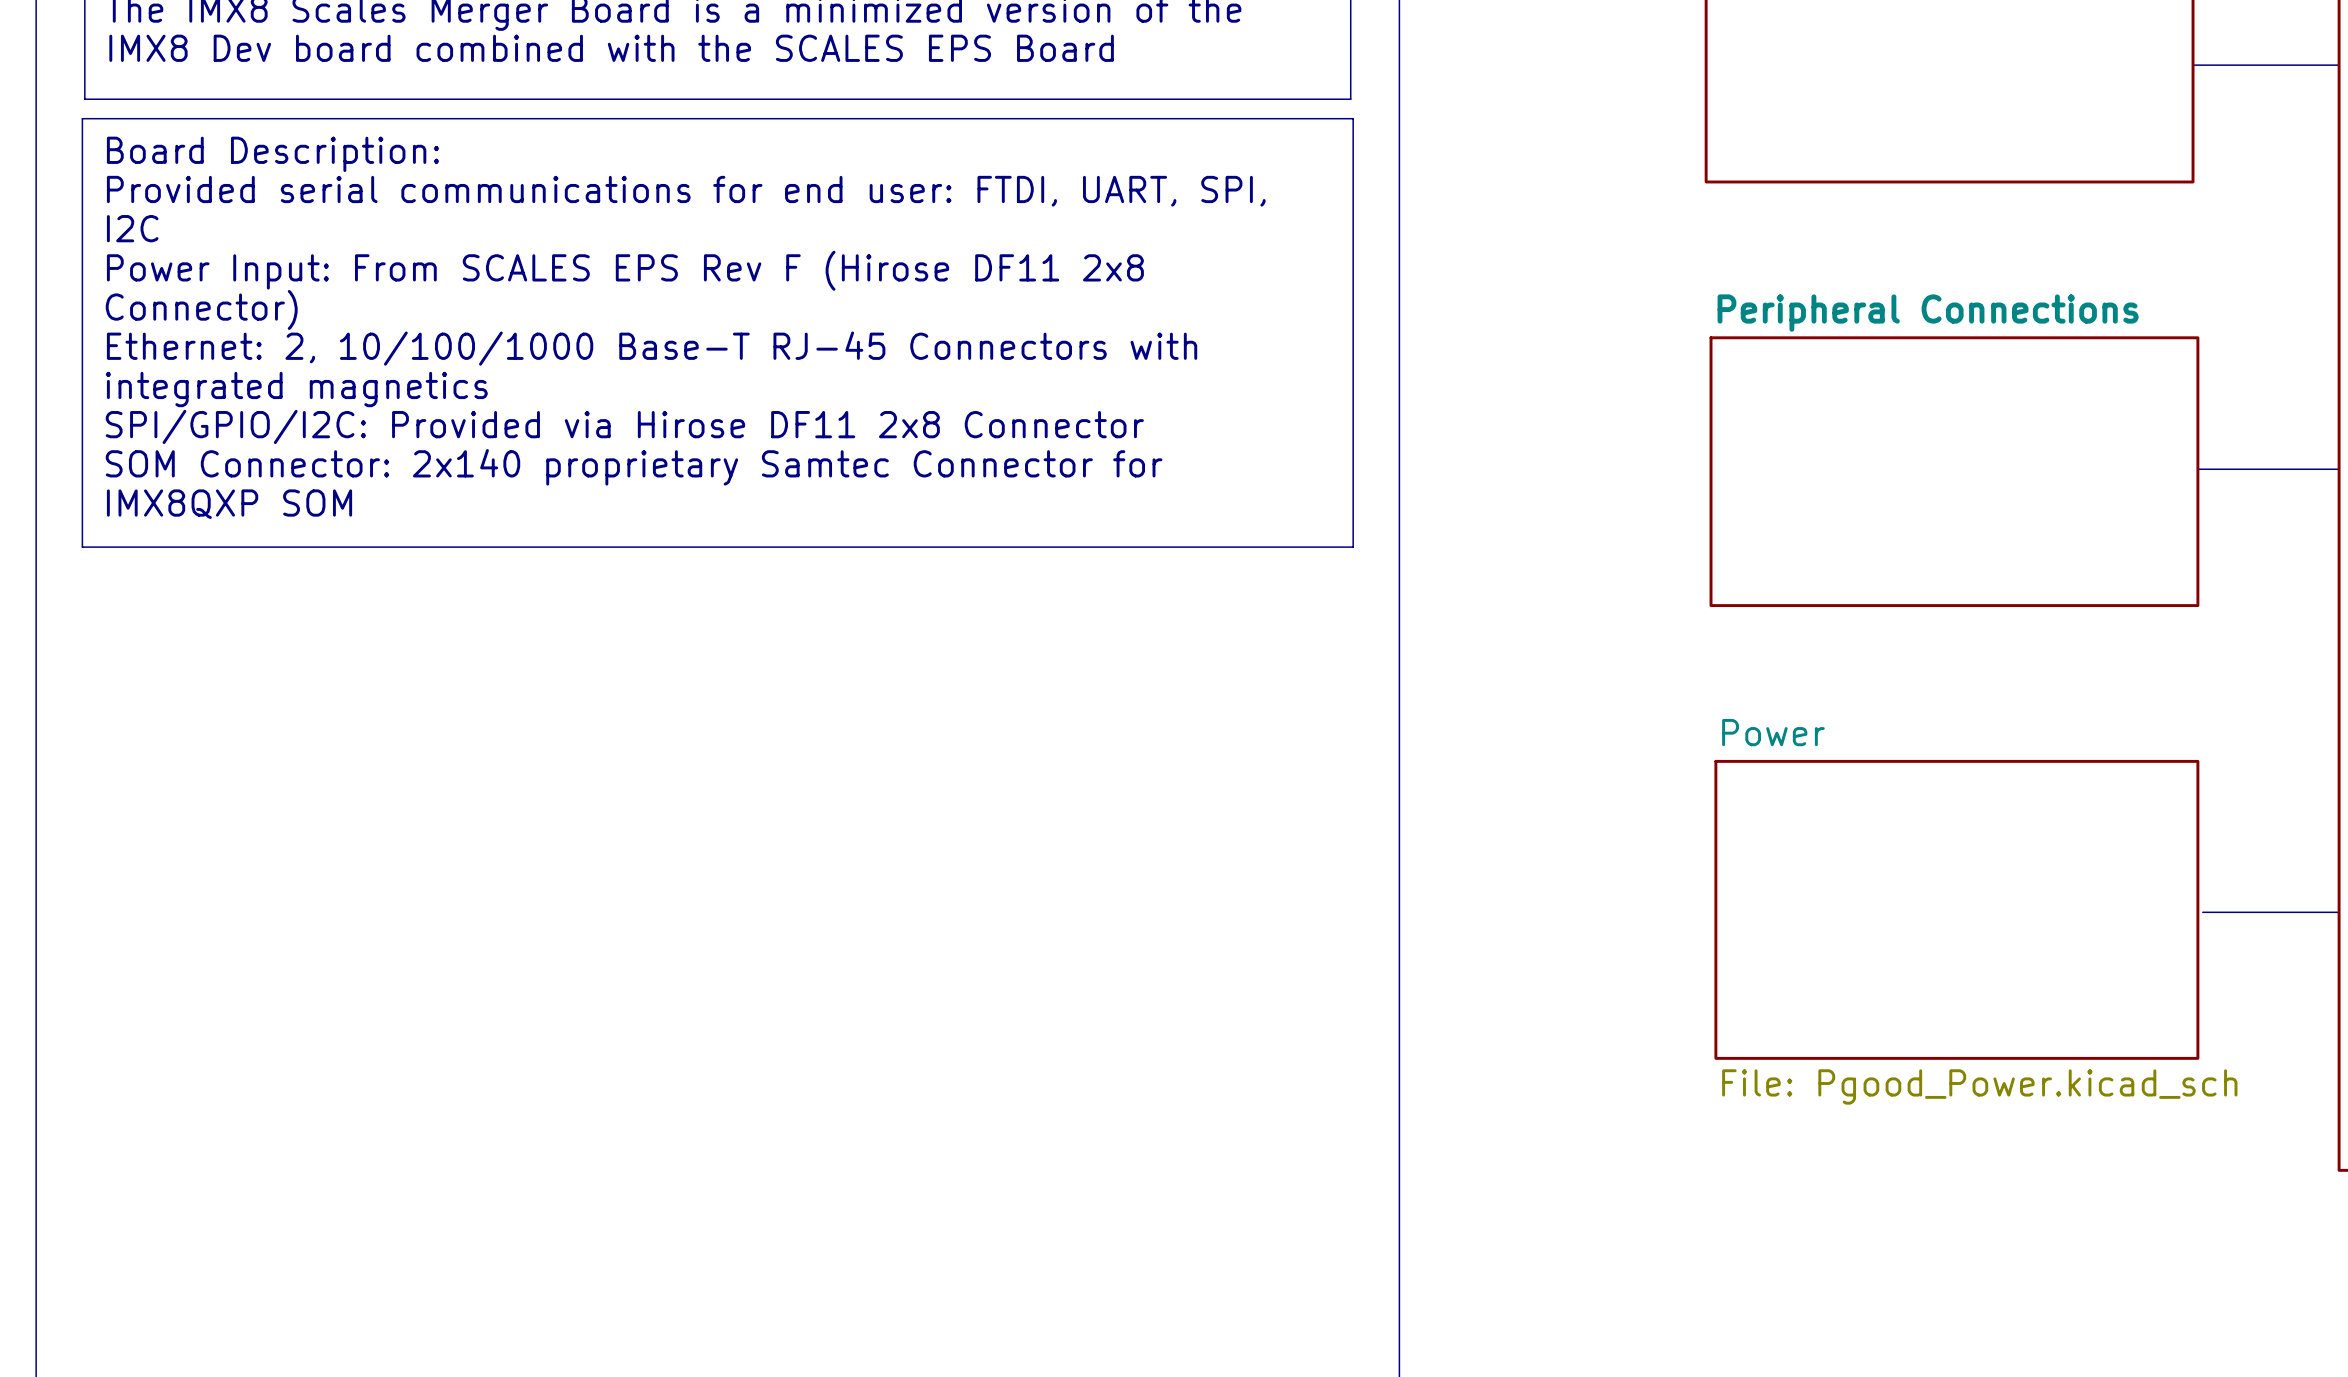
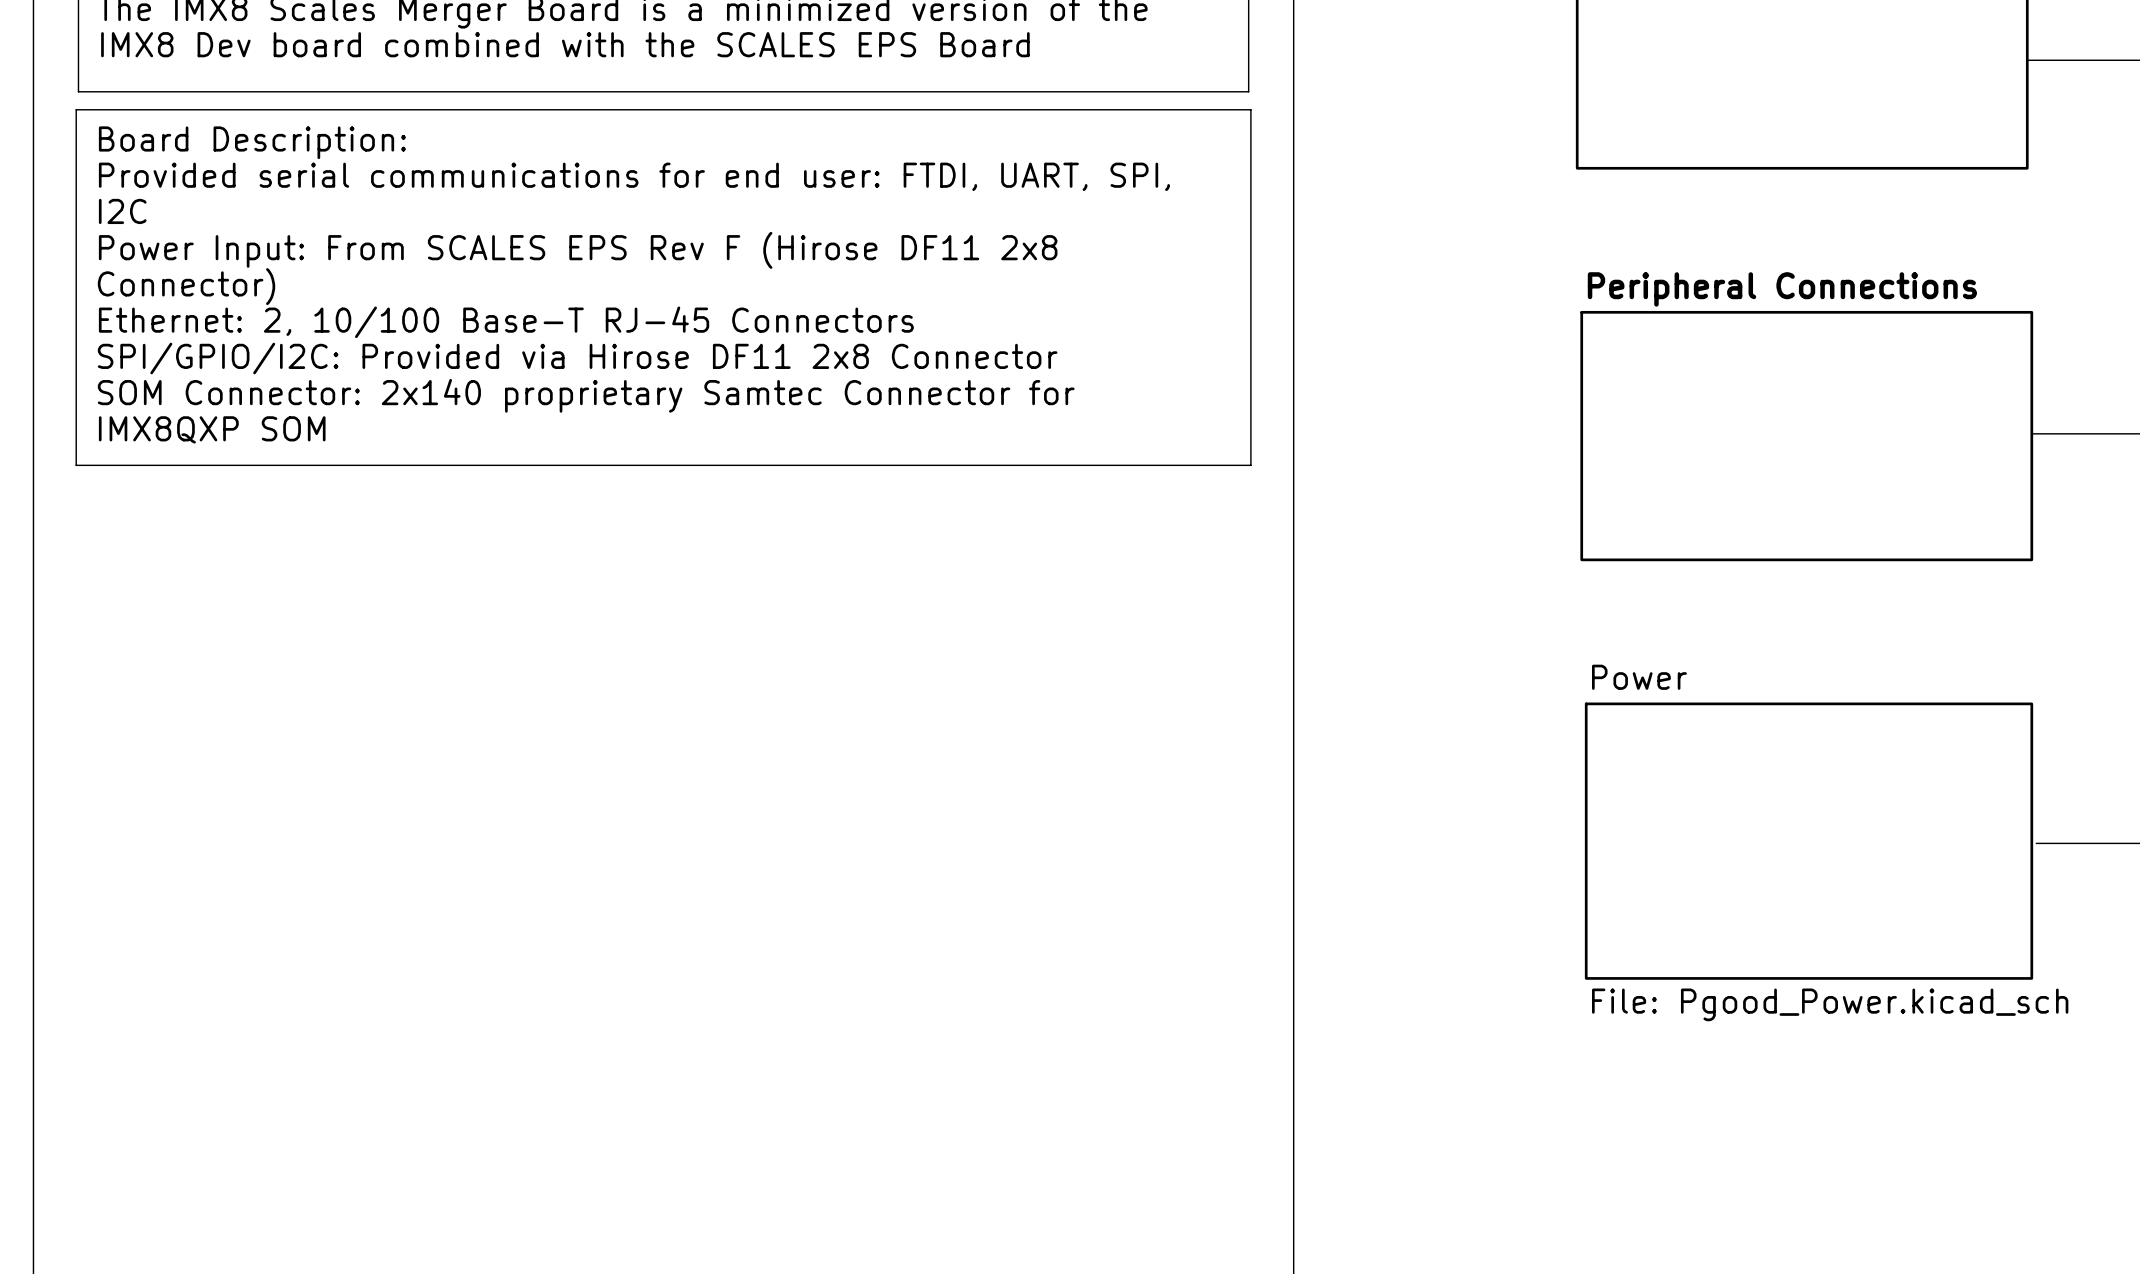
text: Ethernet: 2, 10/100/1000 Base-T RJ-45 Connectors with (652, 348) -> Ethernet: 2, 10/100 Base-T RJ-45 Connectors (506, 322)
text: integrated magnetics (296, 389) -> SPI/GPIO/I2C: Provided via Hirose DF11 2x8 Connector (577, 358)
text: SPI/GPIO/I2C: Provided via Hirose DF11 2x8 Connector (624, 426) -> SOM Connector: 2x140 proprietary Samtec Connector for (586, 395)
text: SOM Connector: 2x140 proprietary Samtec Connector for (634, 467) -> IMX8QXP SOM (212, 429)
line: (82, 503) (82, 547) (1353, 547) (1353, 503) -> (76, 465) (1250, 465)
text: IMX8QXP SOM (229, 504) -> none

